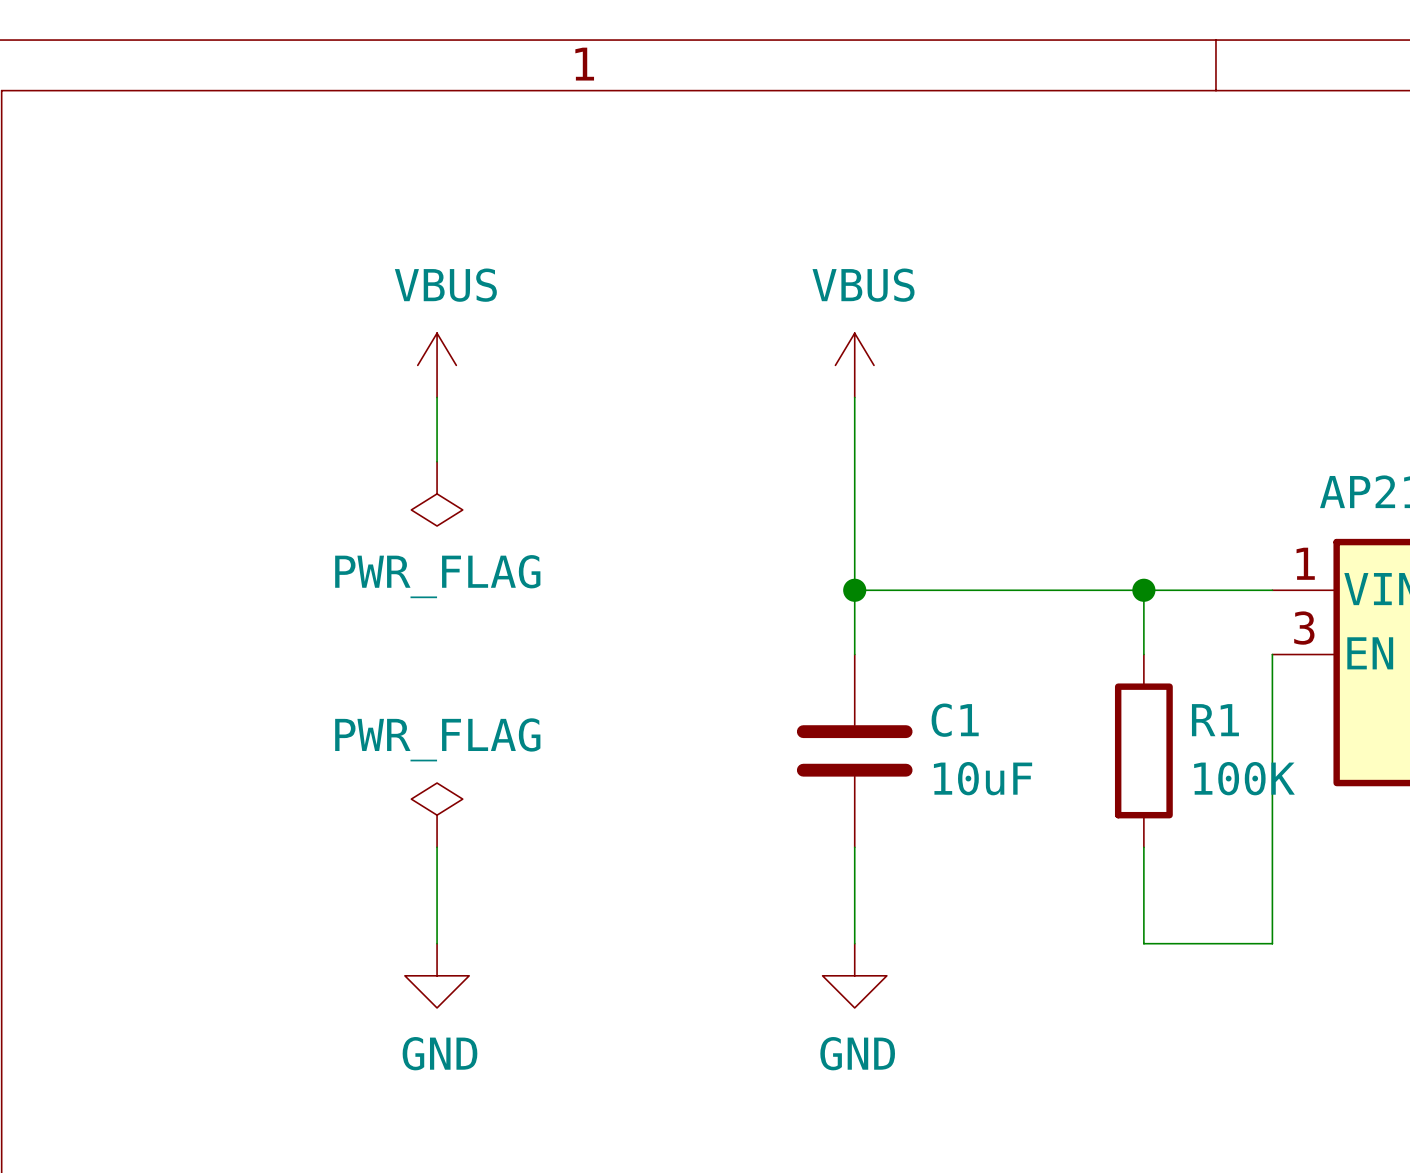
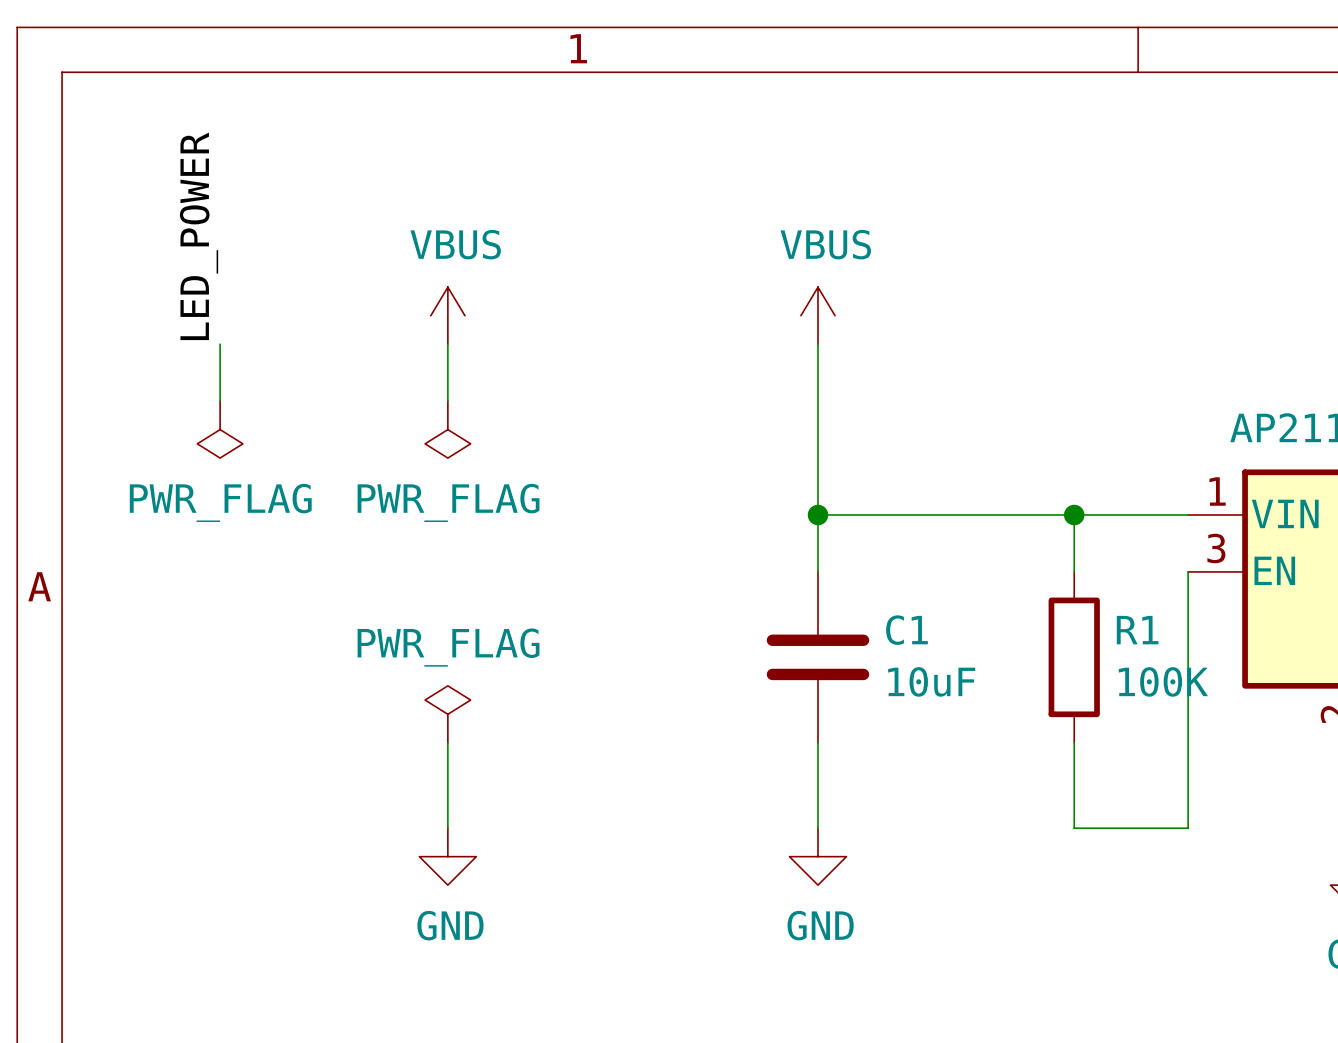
label: none -> LED_POWER (199, 236)
wire: none -> (220, 344) (220, 401)
power symbol: none -> PWR_FLAG (220, 429)

